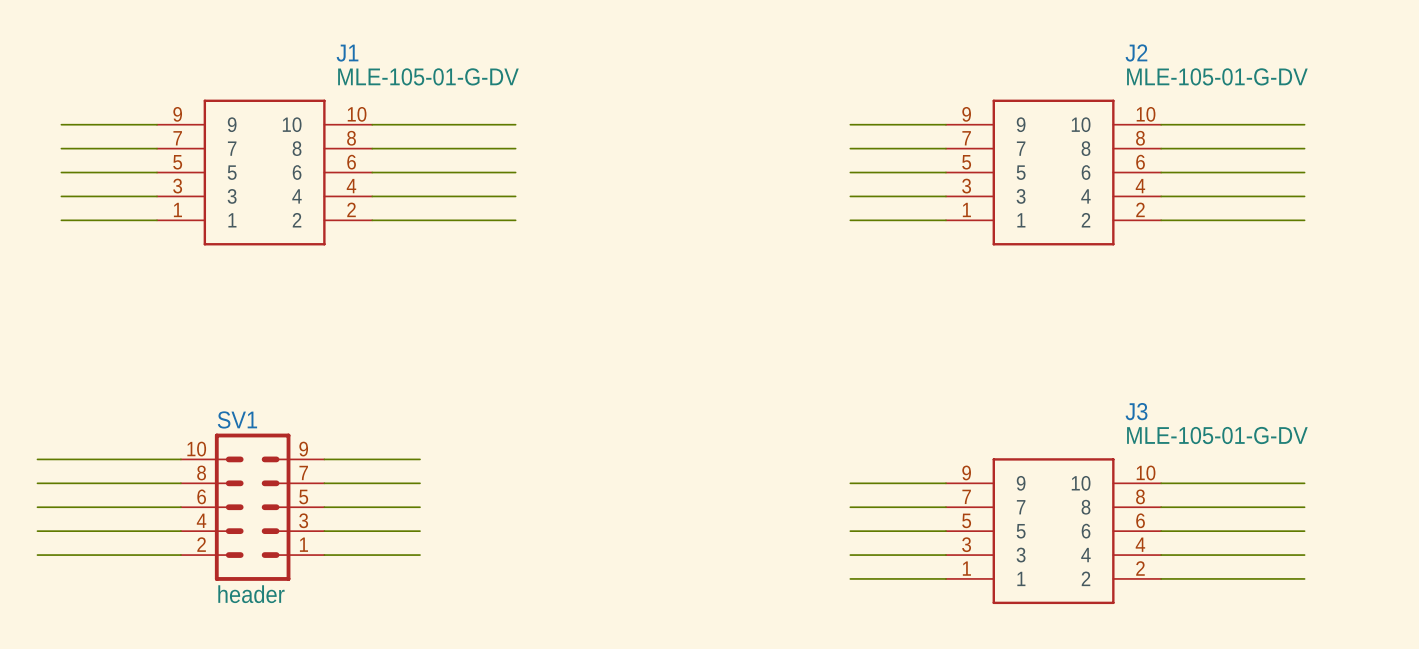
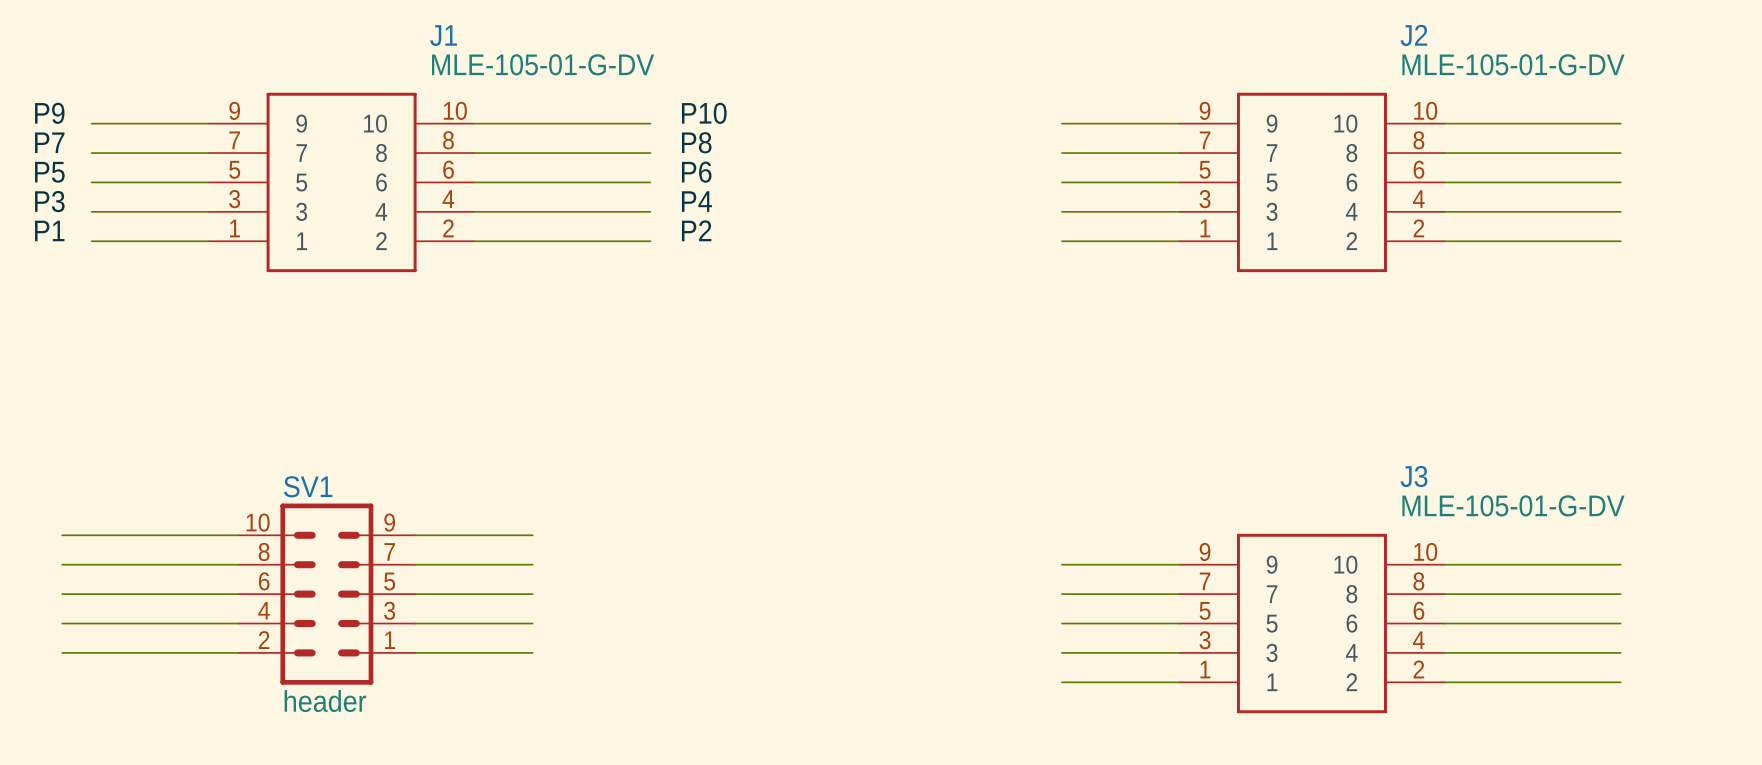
label: none -> P9 (49, 113)
label: none -> P10 (704, 113)
label: none -> P7 (49, 142)
label: none -> P8 (696, 142)
label: none -> P5 (49, 172)
label: none -> P6 (696, 172)
label: none -> P3 (49, 201)
label: none -> P4 (696, 201)
label: none -> P1 (49, 230)
label: none -> P2 (696, 230)

